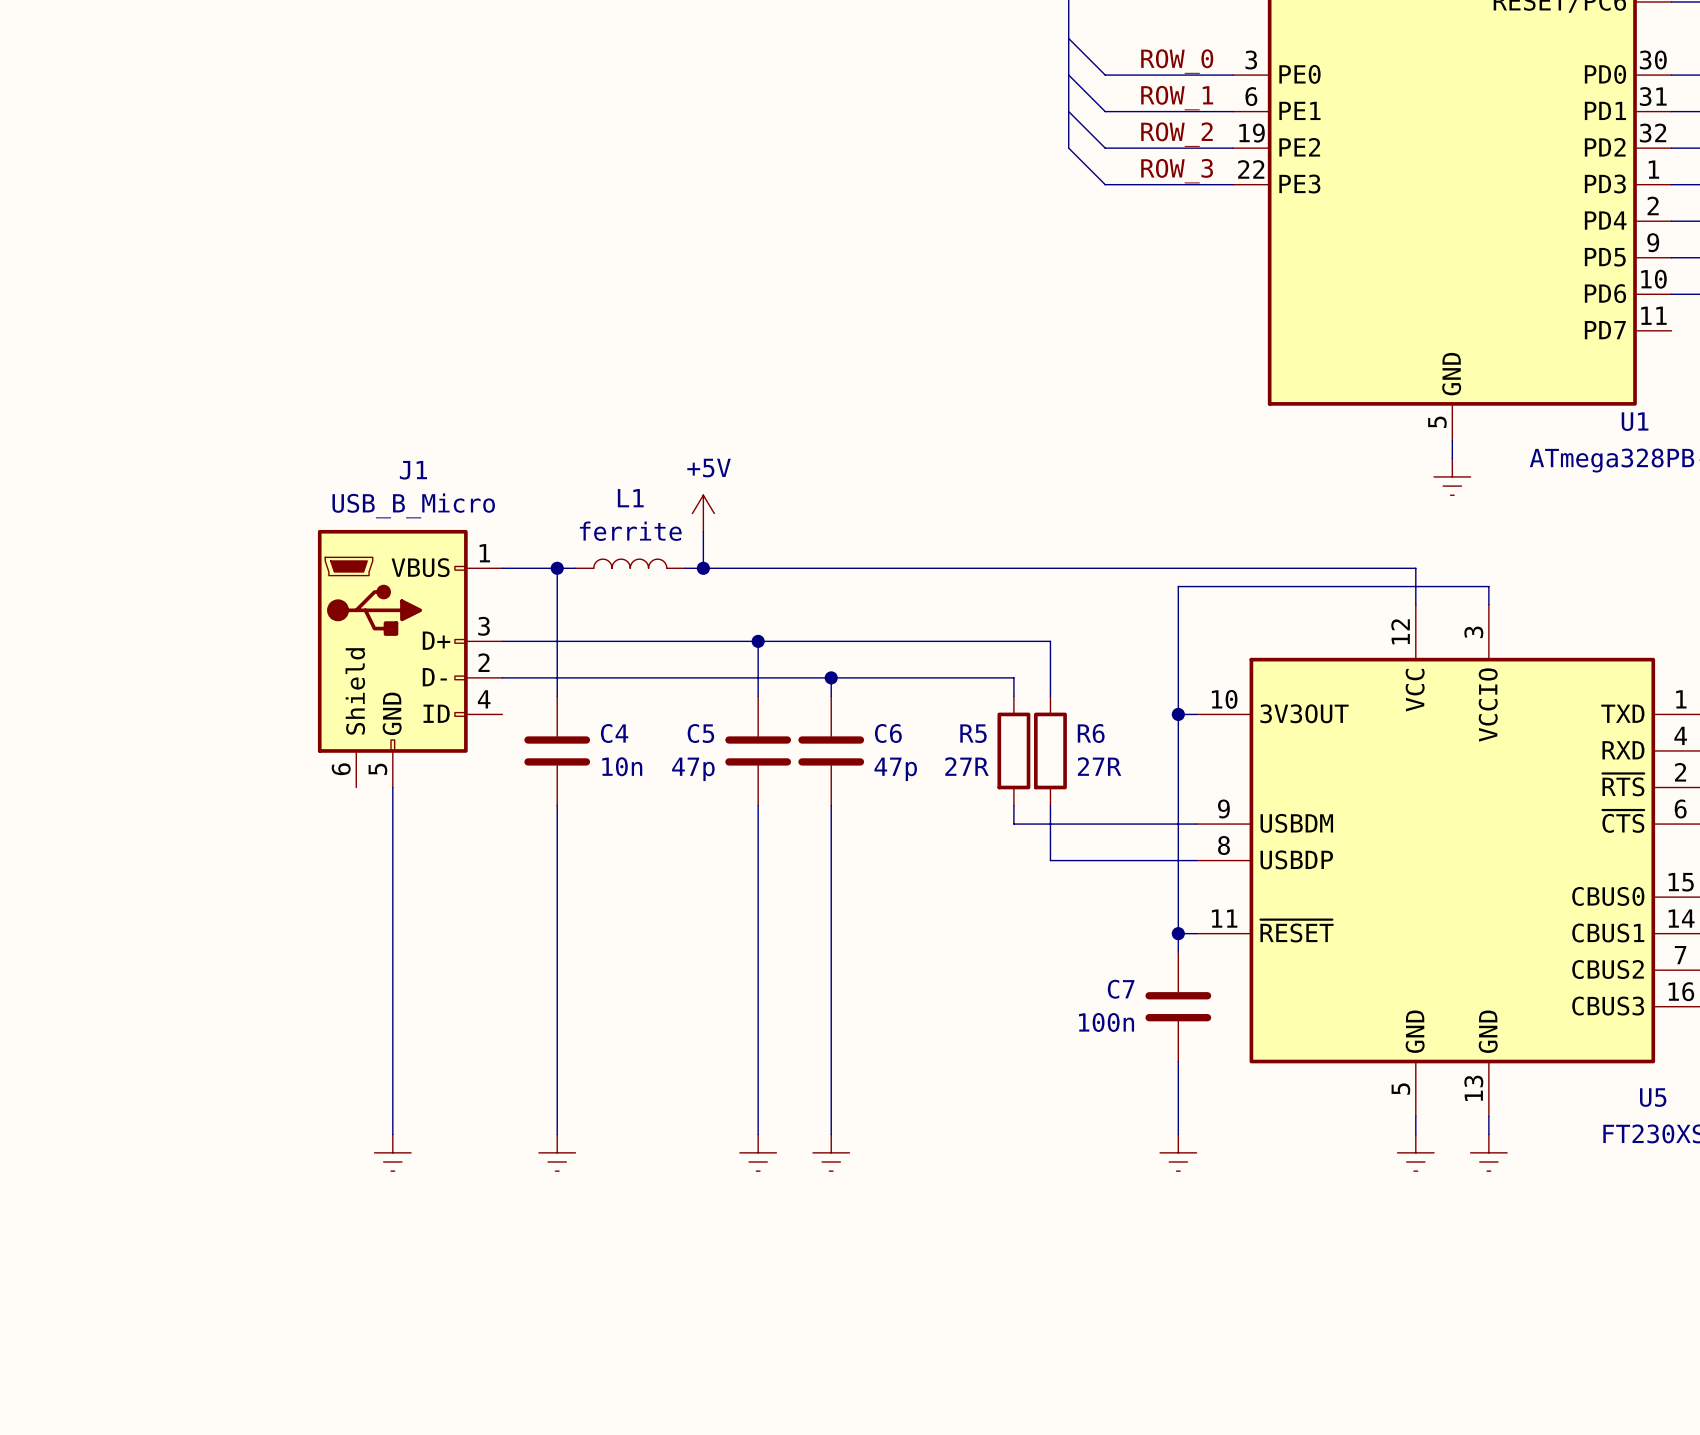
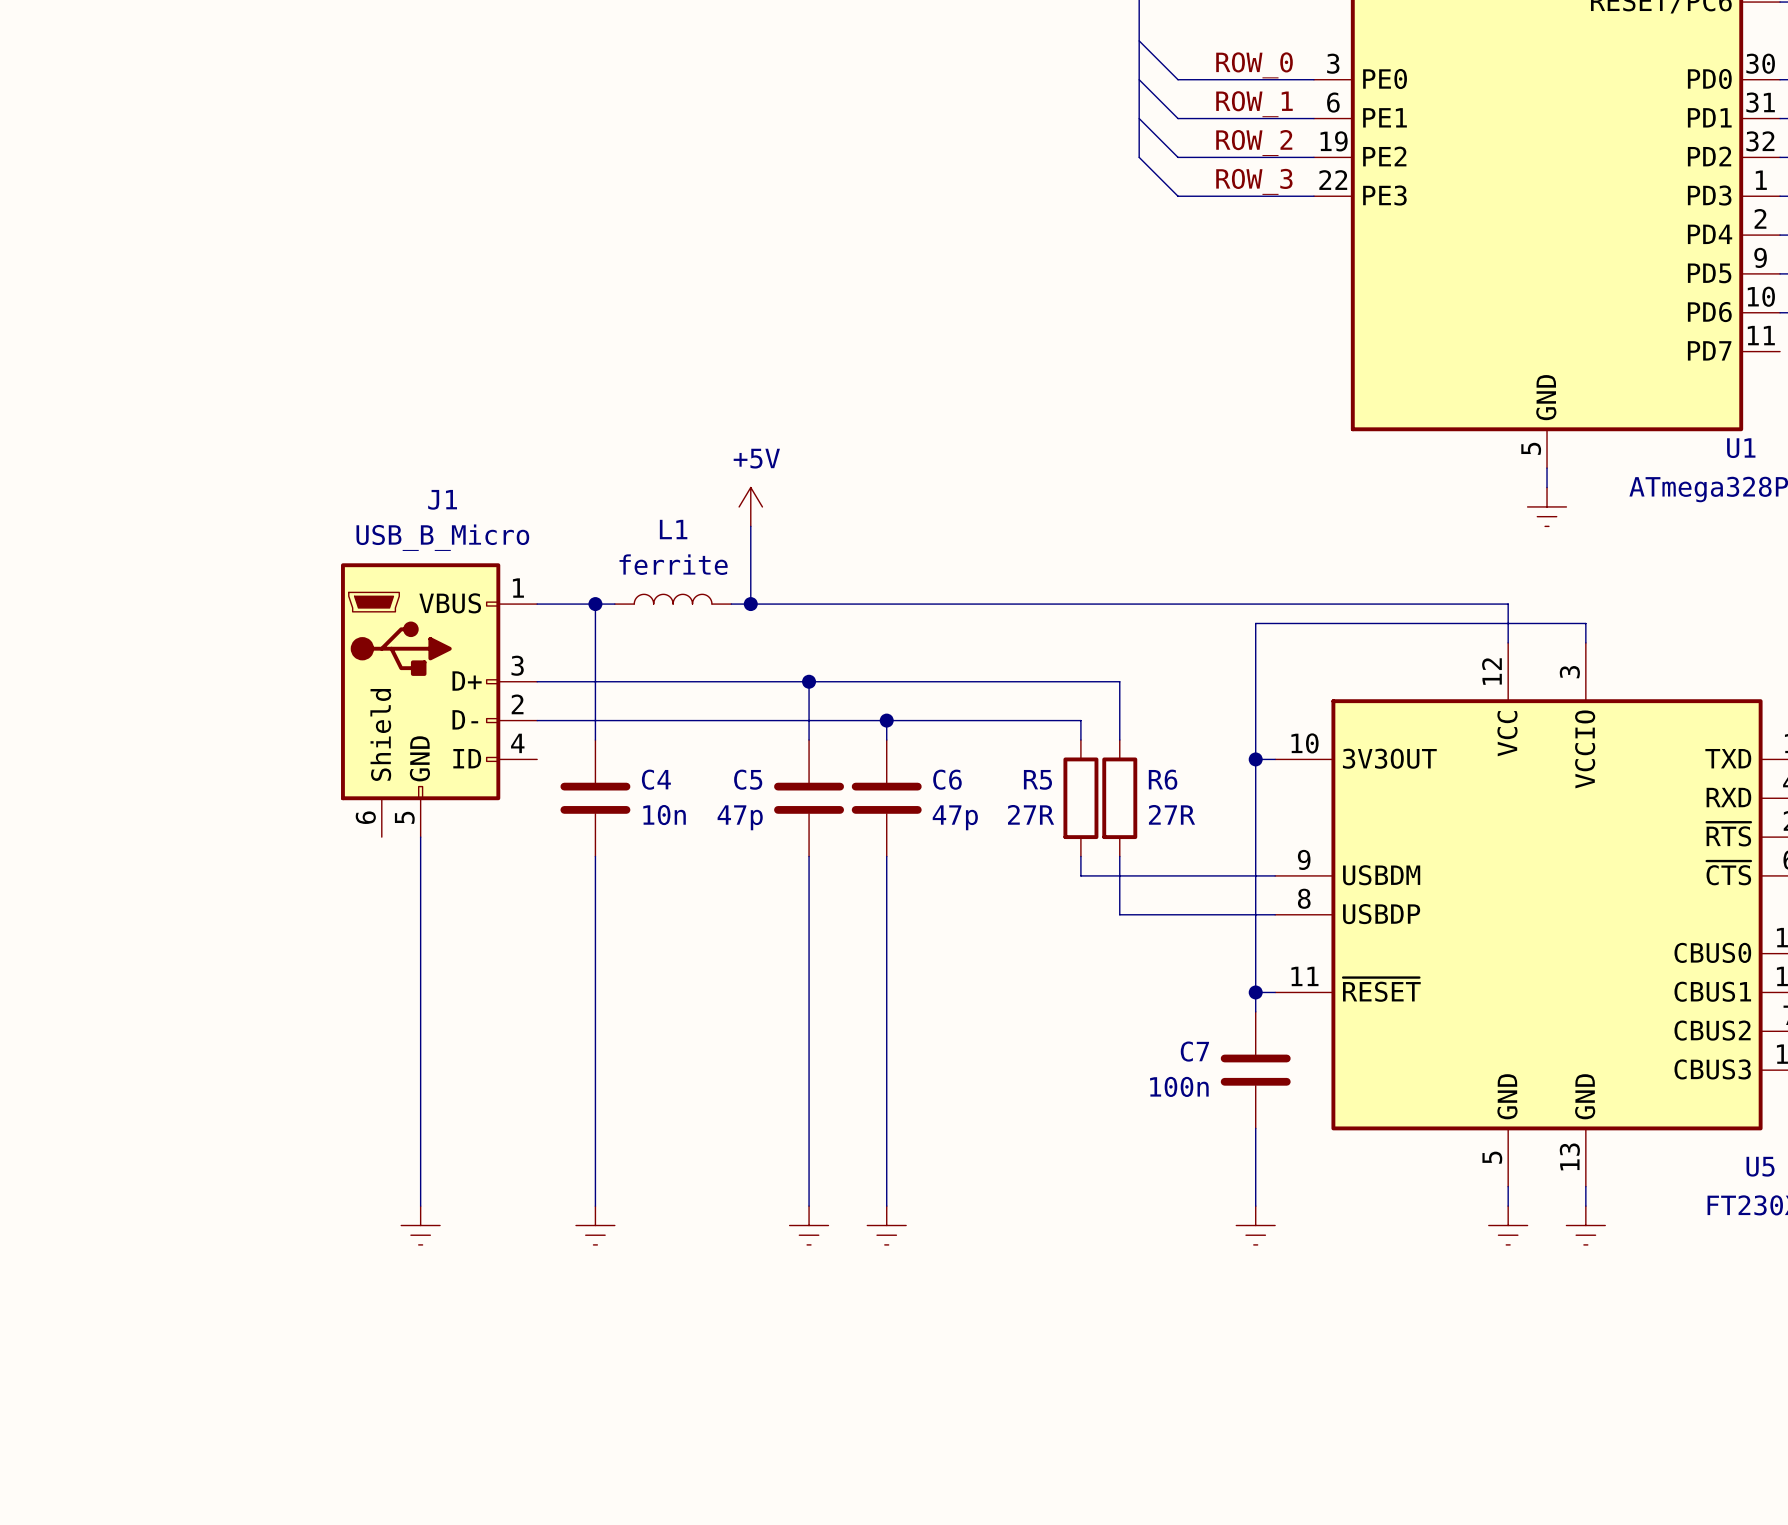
power symbol position: +5V (703, 513) -> +5V (750, 506)

